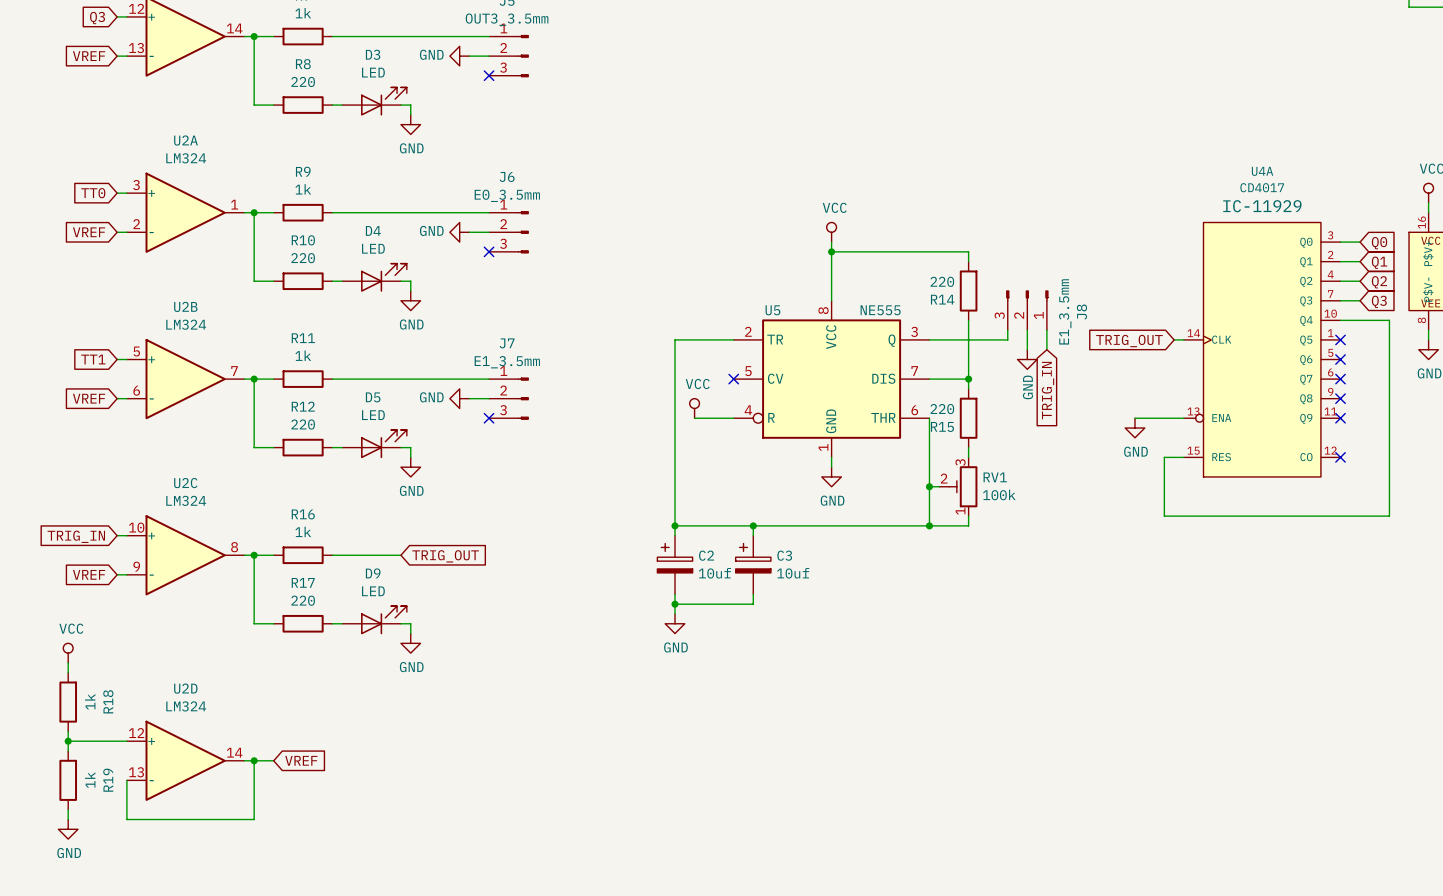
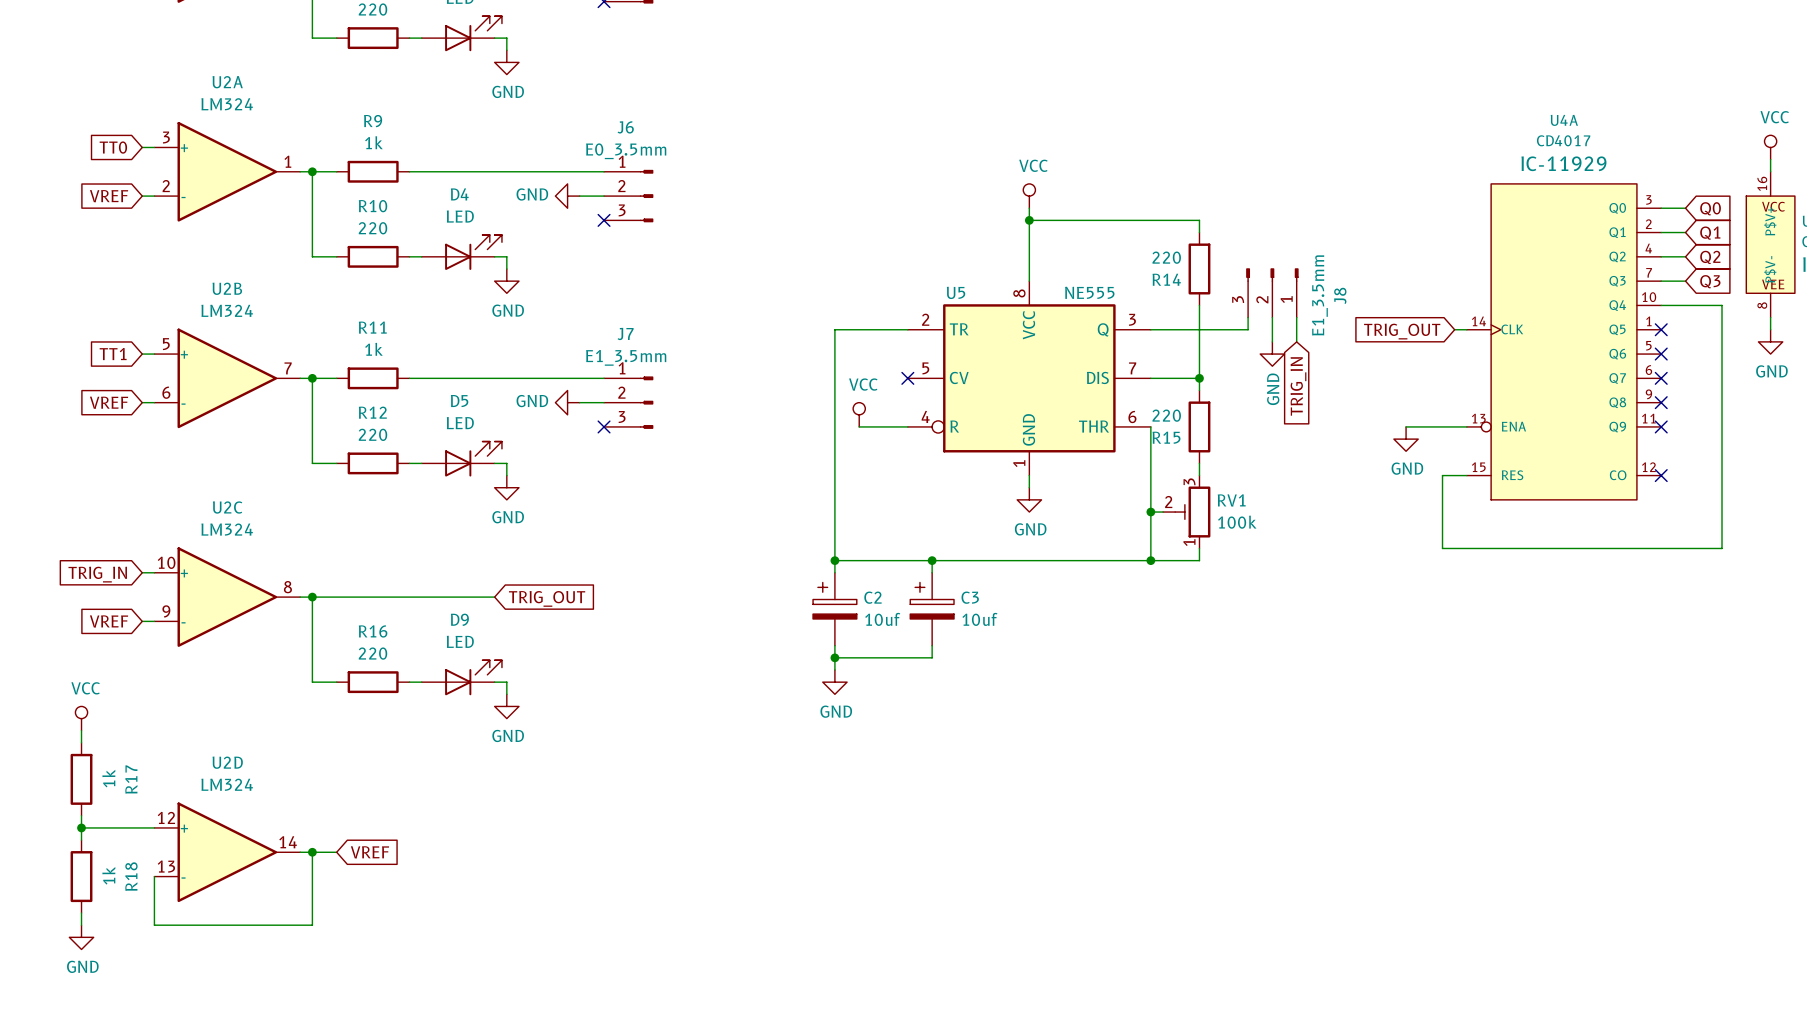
wire: none -> (336, 597) (409, 597)
R16: 1k (303, 555) -> none
R17 name: R17 (303, 582) -> R16 (373, 631)
R18 name: R18 (108, 701) -> R17 (131, 779)
R19 name: R19 (108, 780) -> R18 (131, 876)

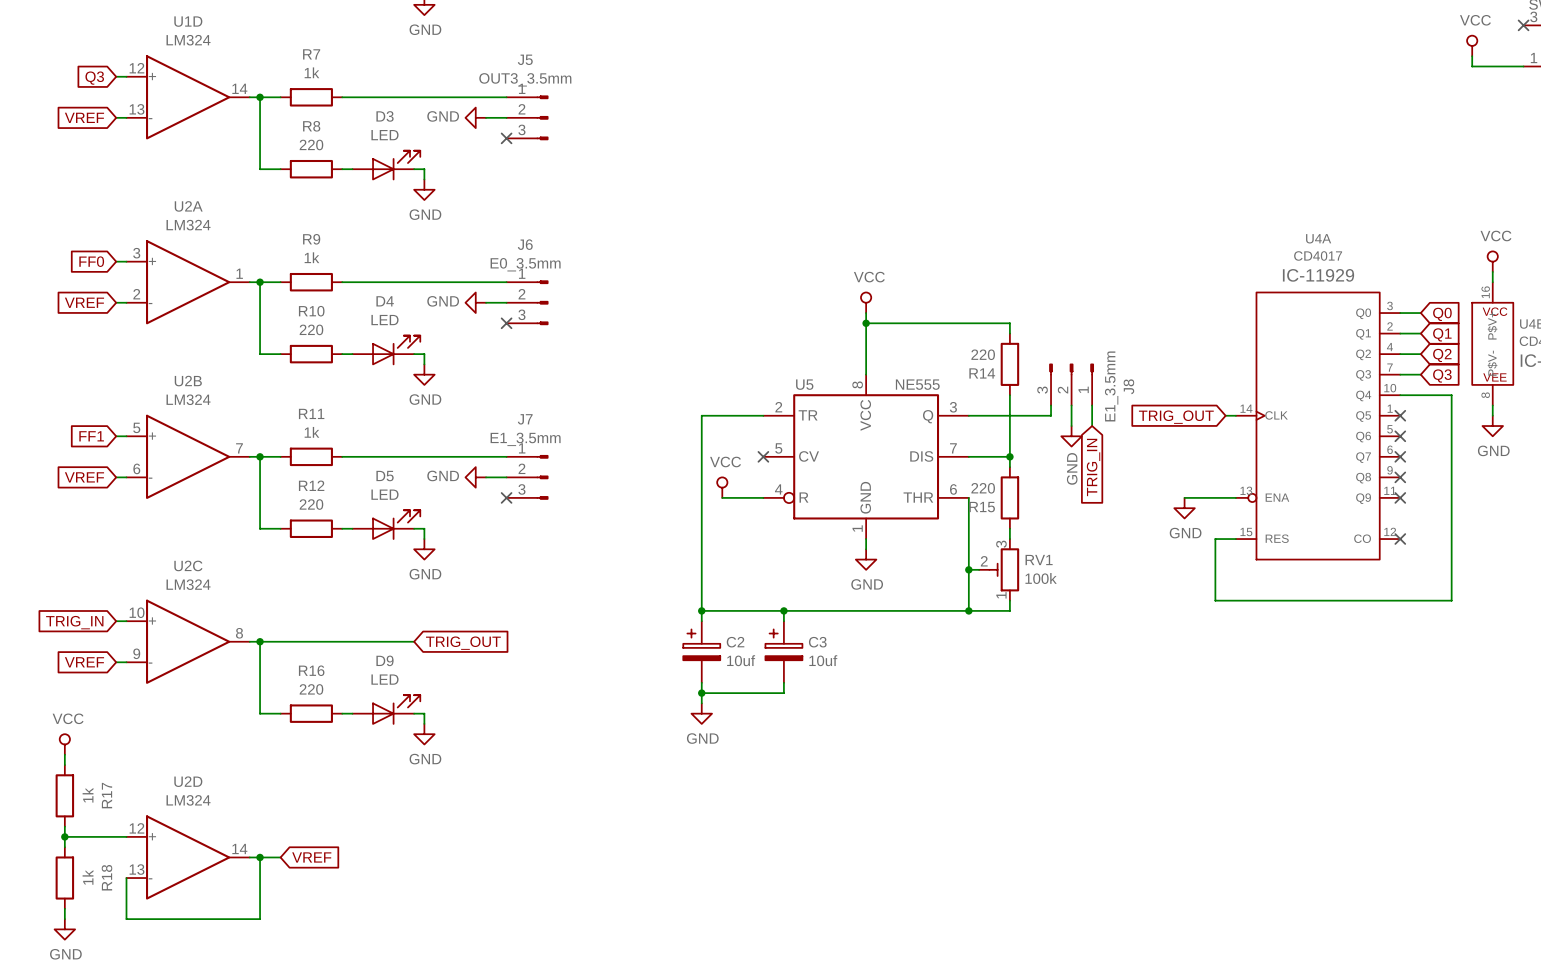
global label: TT0 (113, 147) -> FF0 (91, 261)
global label: TT1 (113, 354) -> FF1 (91, 436)

